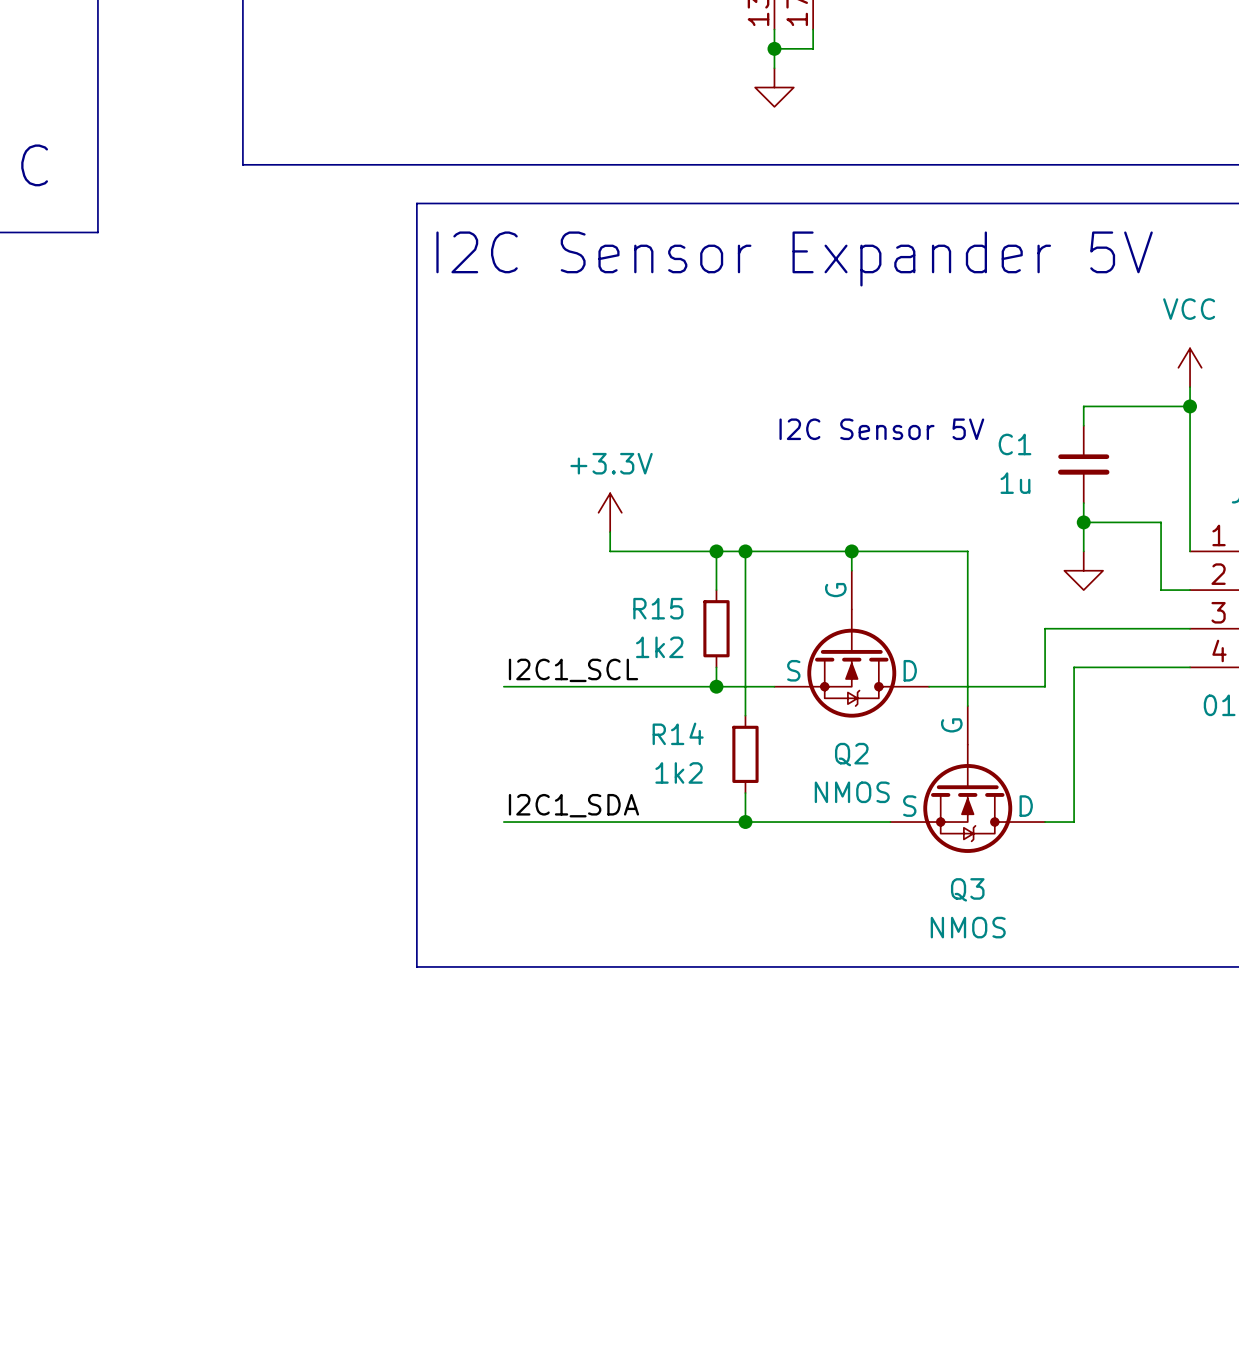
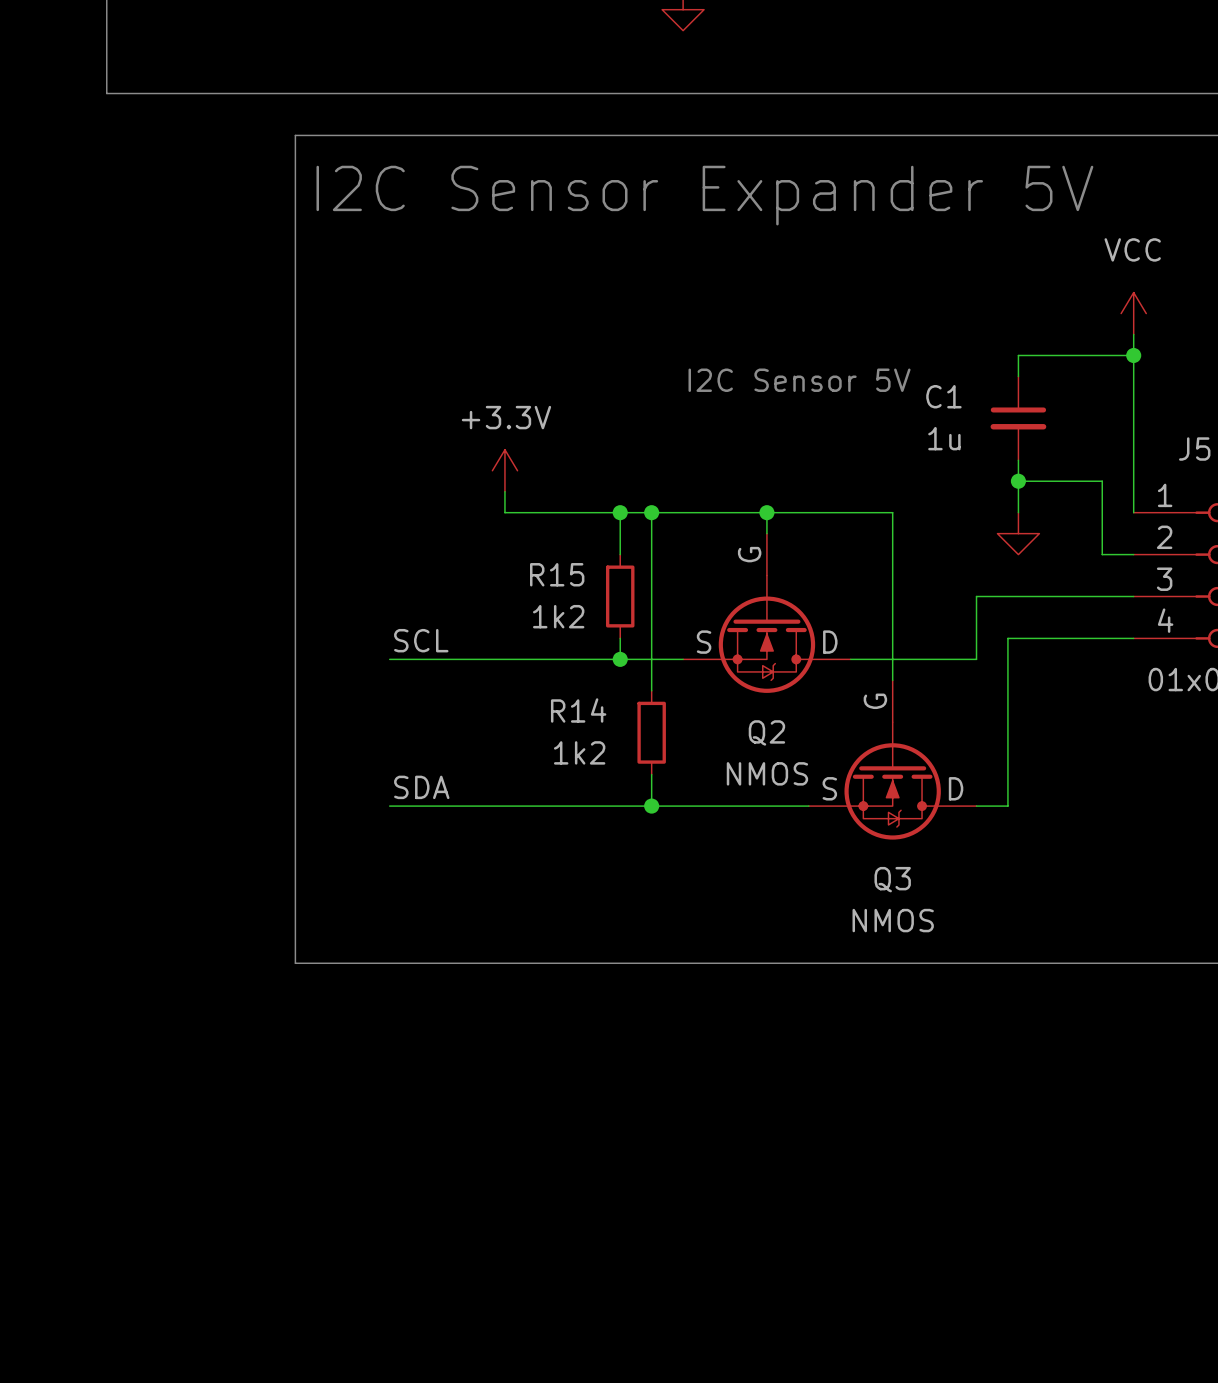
label: I2C1_SCL (573, 670) -> SCL (421, 640)
label: I2C1_SDA (573, 805) -> SDA (421, 787)

